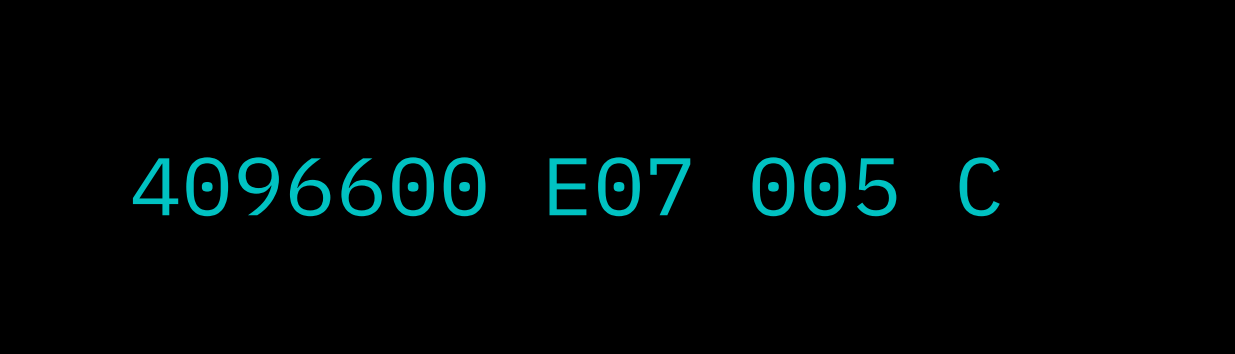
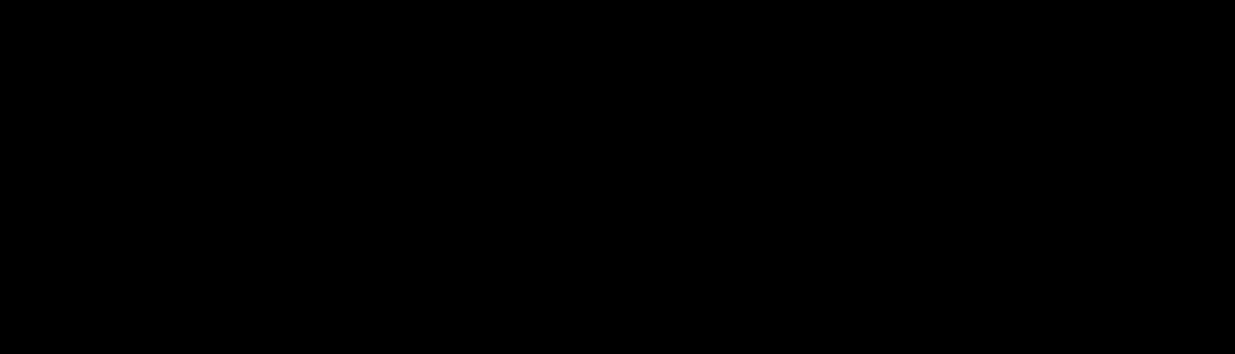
text: 4096600 E07 005 C (566, 186) -> none

